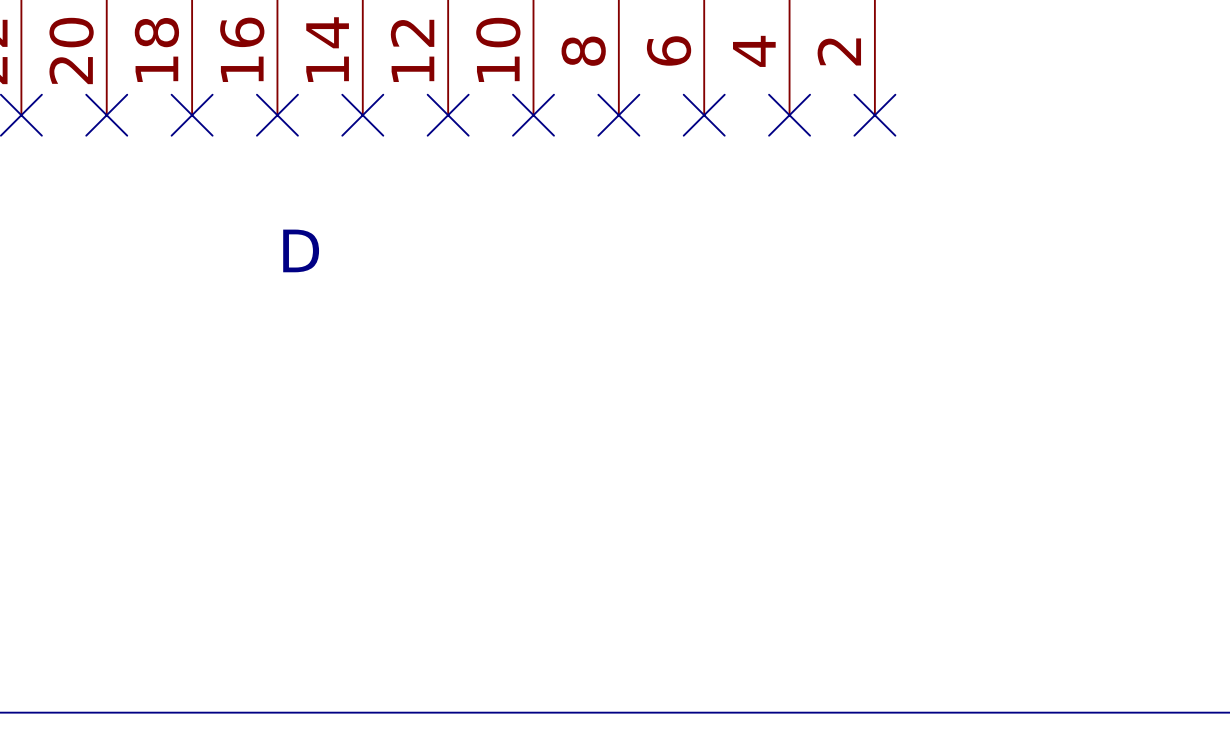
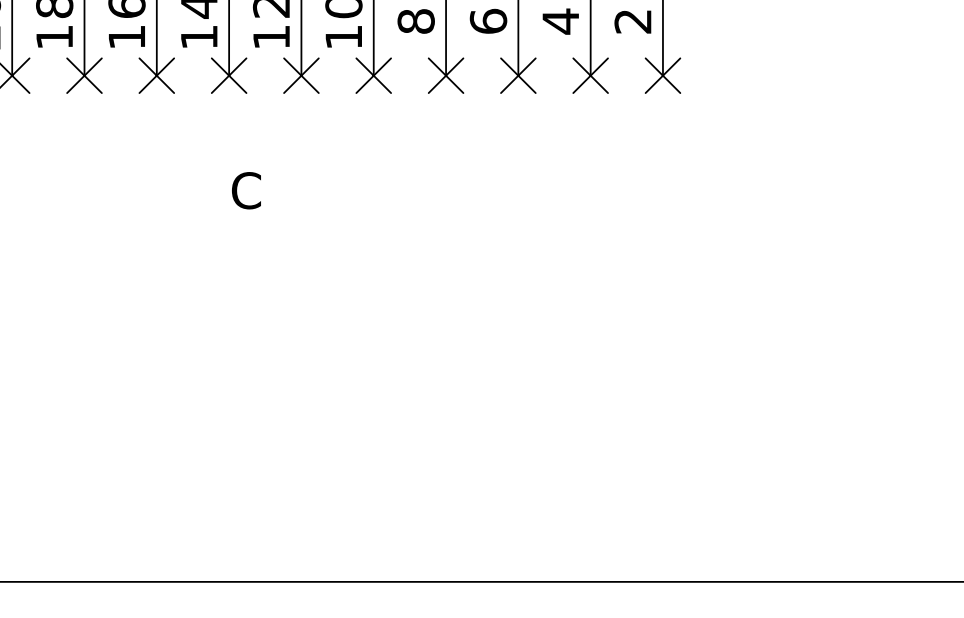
text: D (301, 250) -> none
text: none -> C (246, 190)

